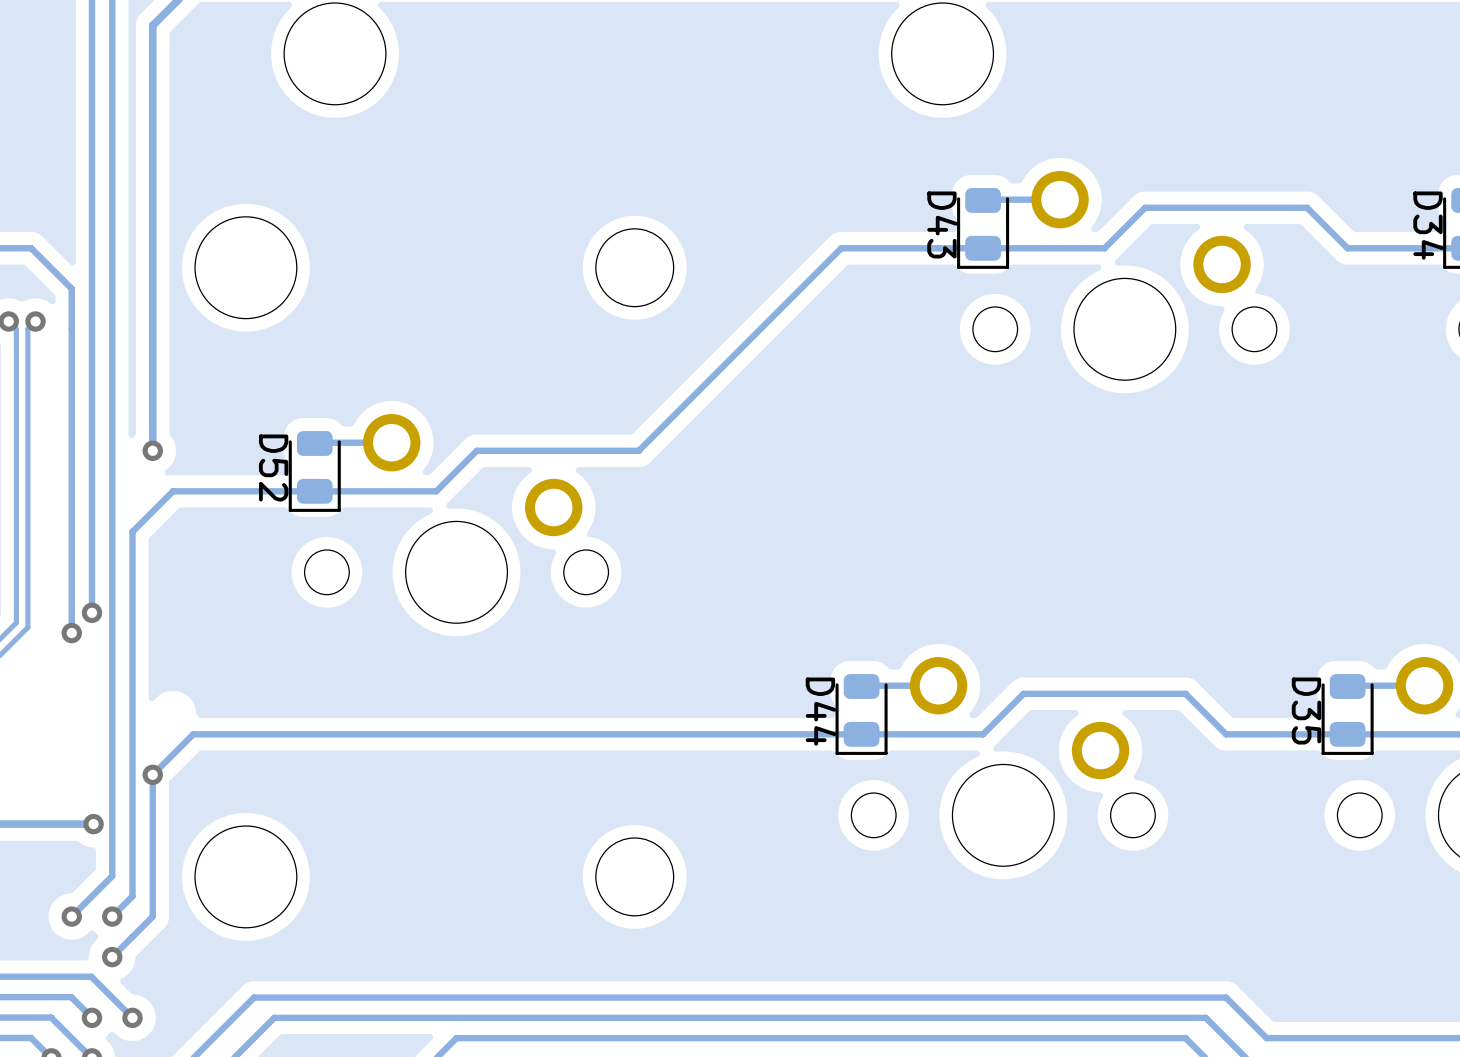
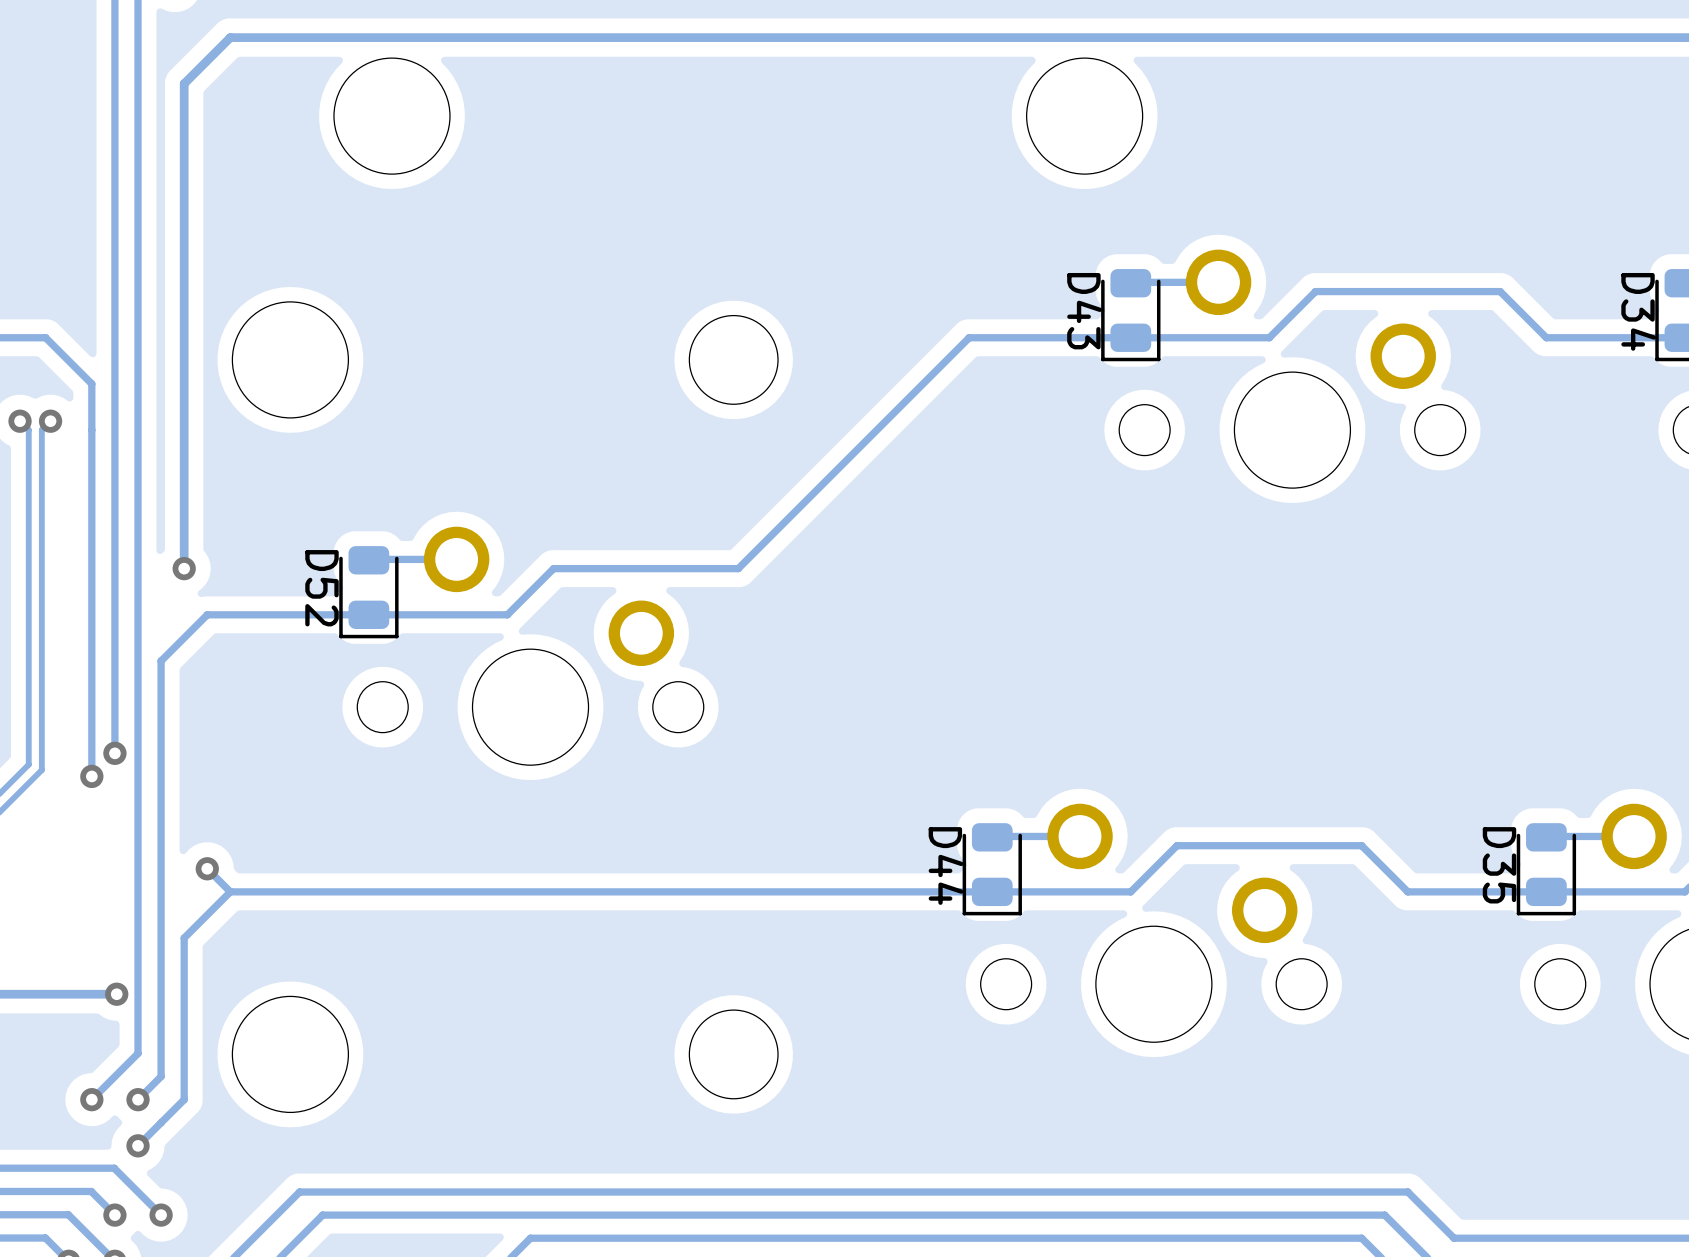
track: none -> (207, 868) (230, 891)
via position: (152, 774) -> (207, 868)

